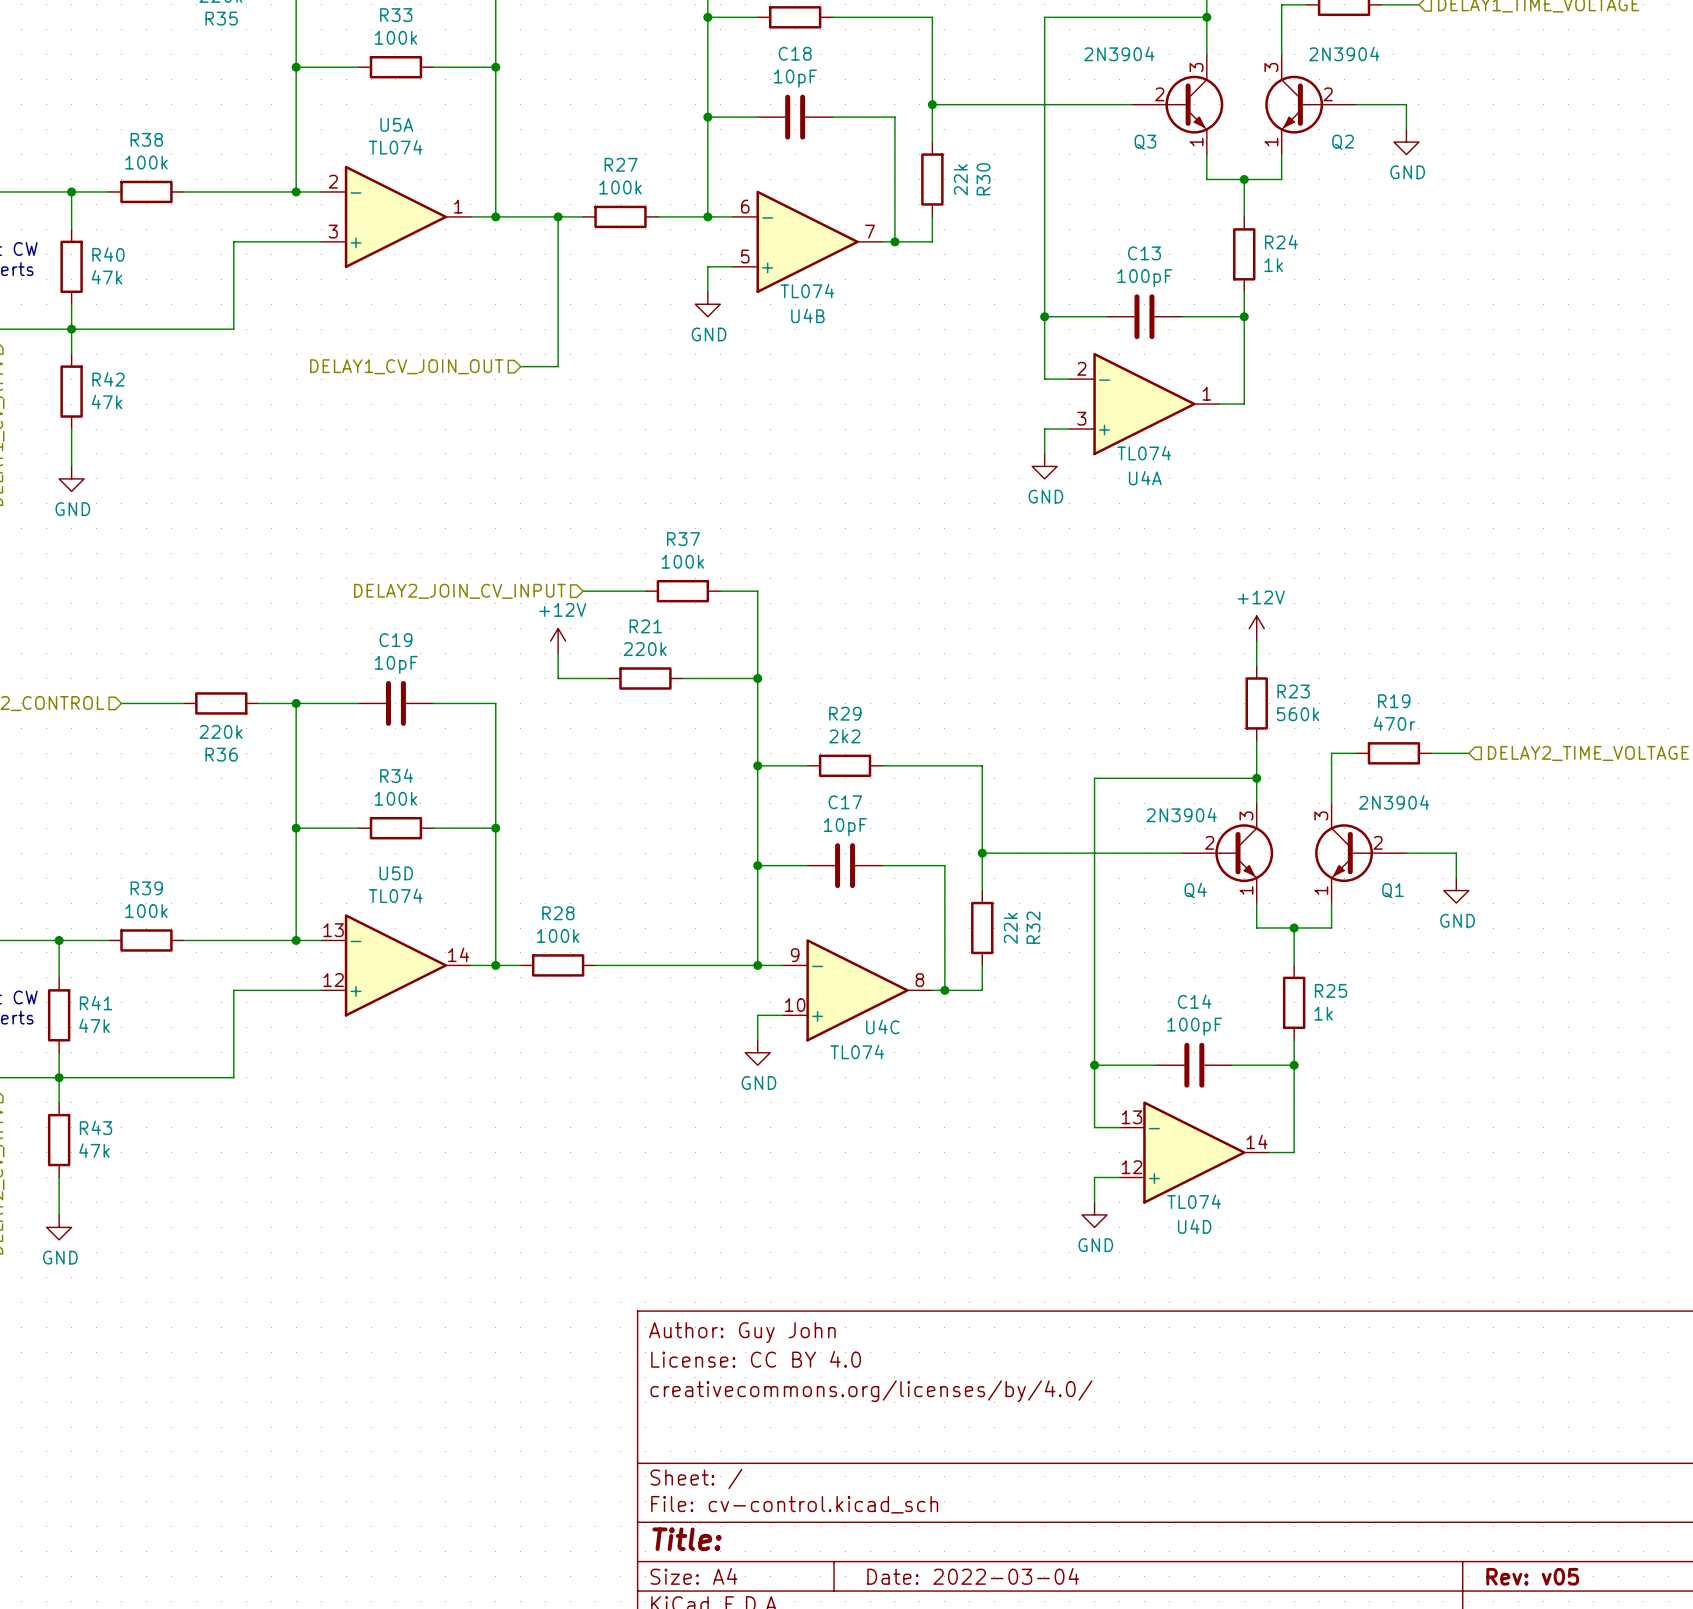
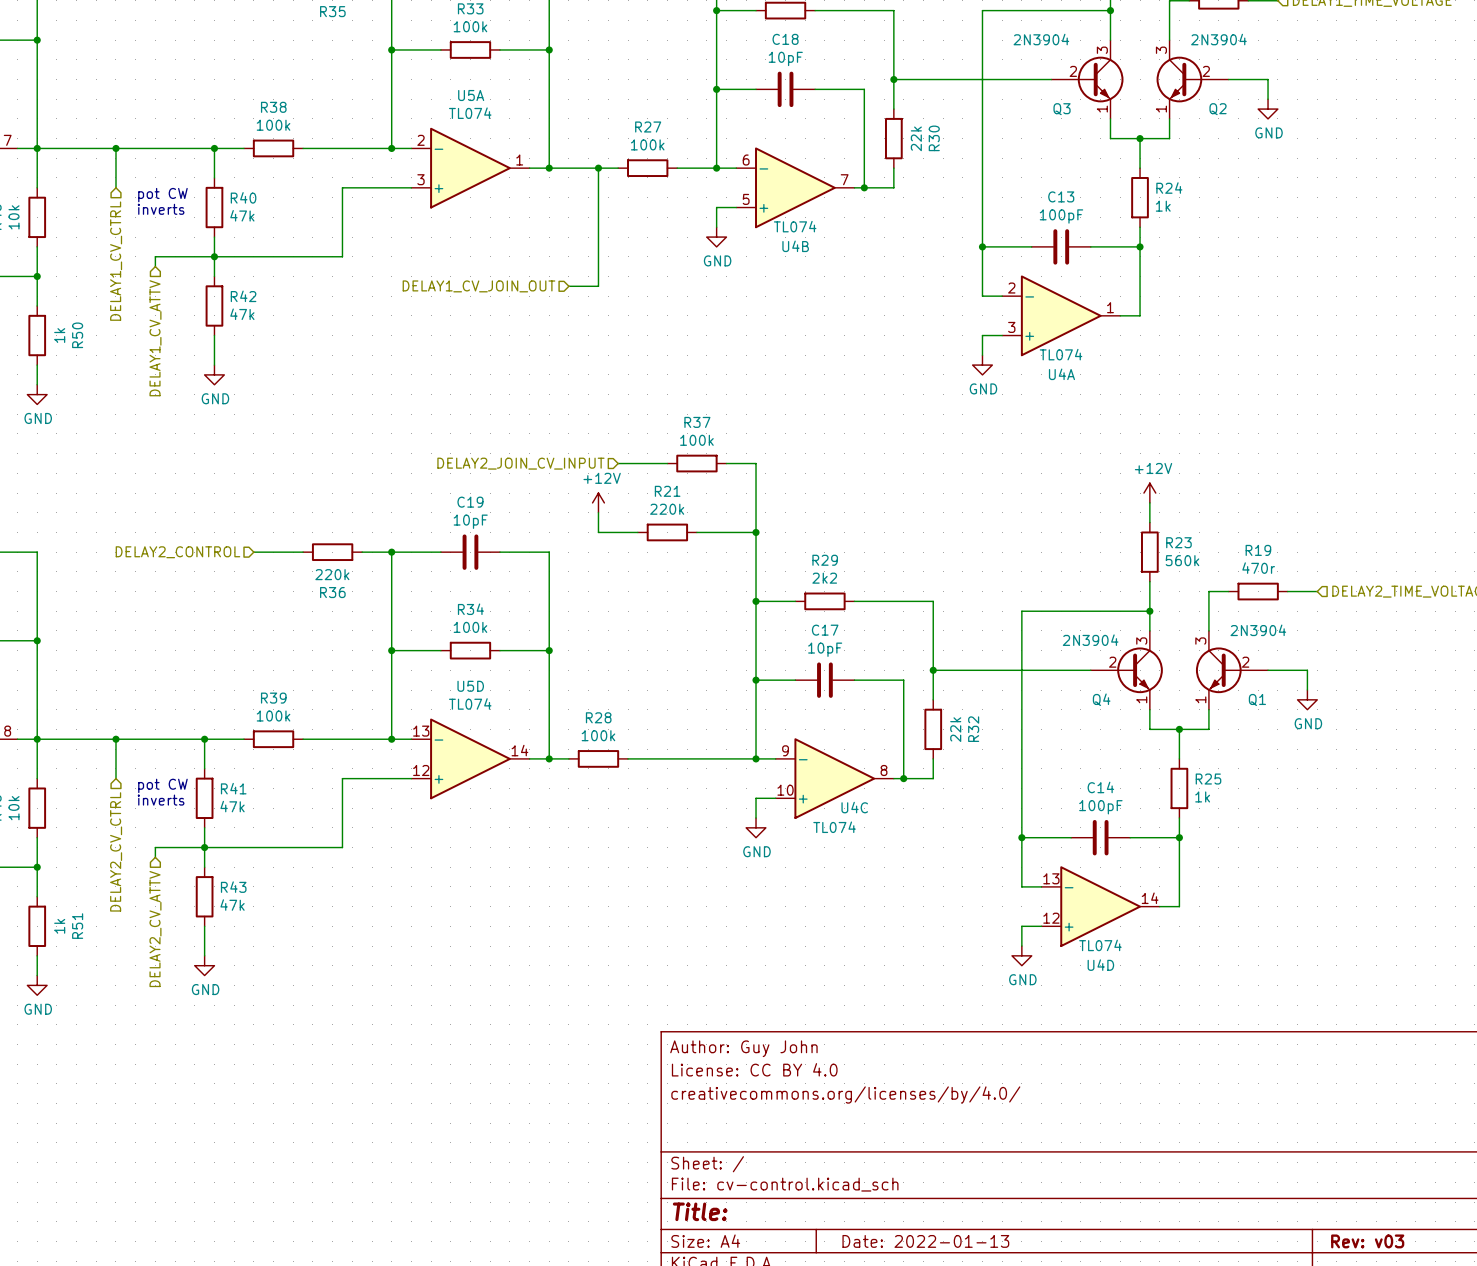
title block: Date: 2022-03-04 (973, 1576) -> Date: 2022-01-13 (925, 1241)
title block: Rev: v05 (1532, 1576) -> Rev: v03 (1367, 1241)

